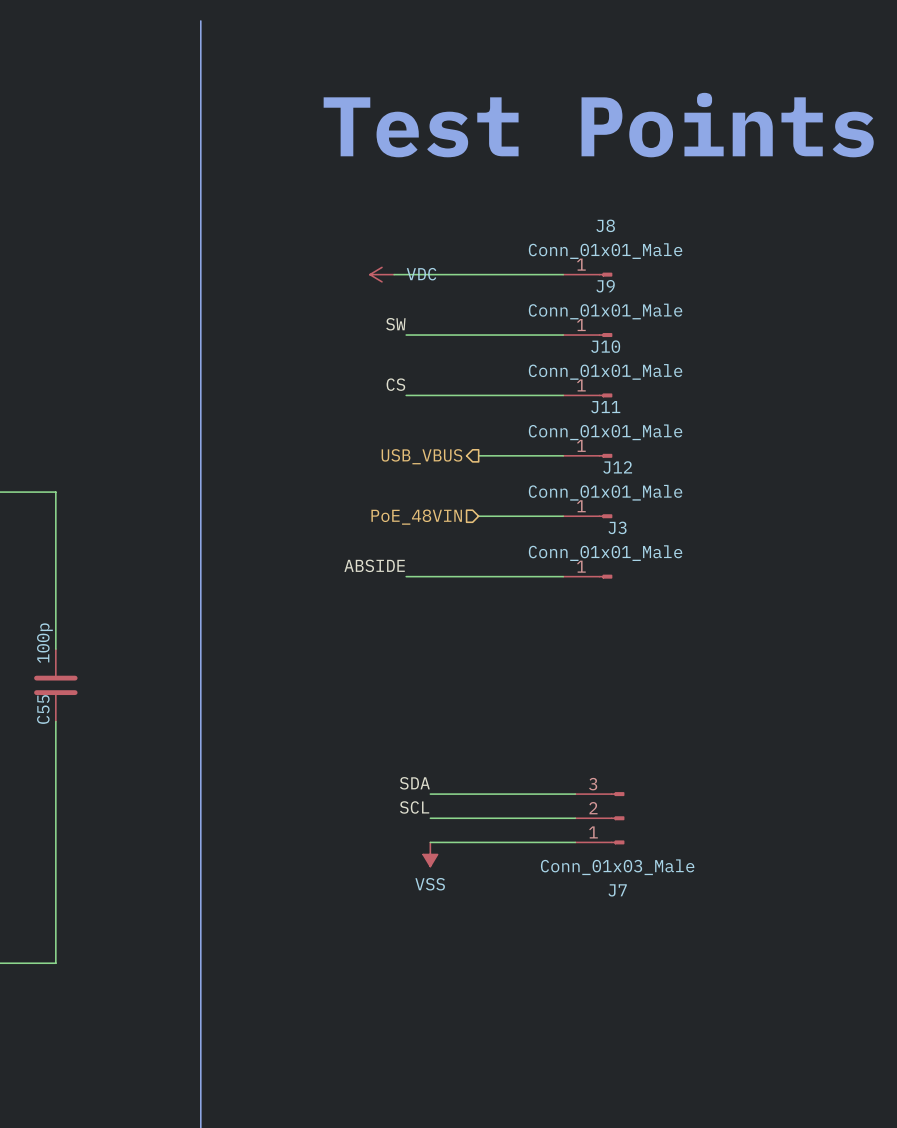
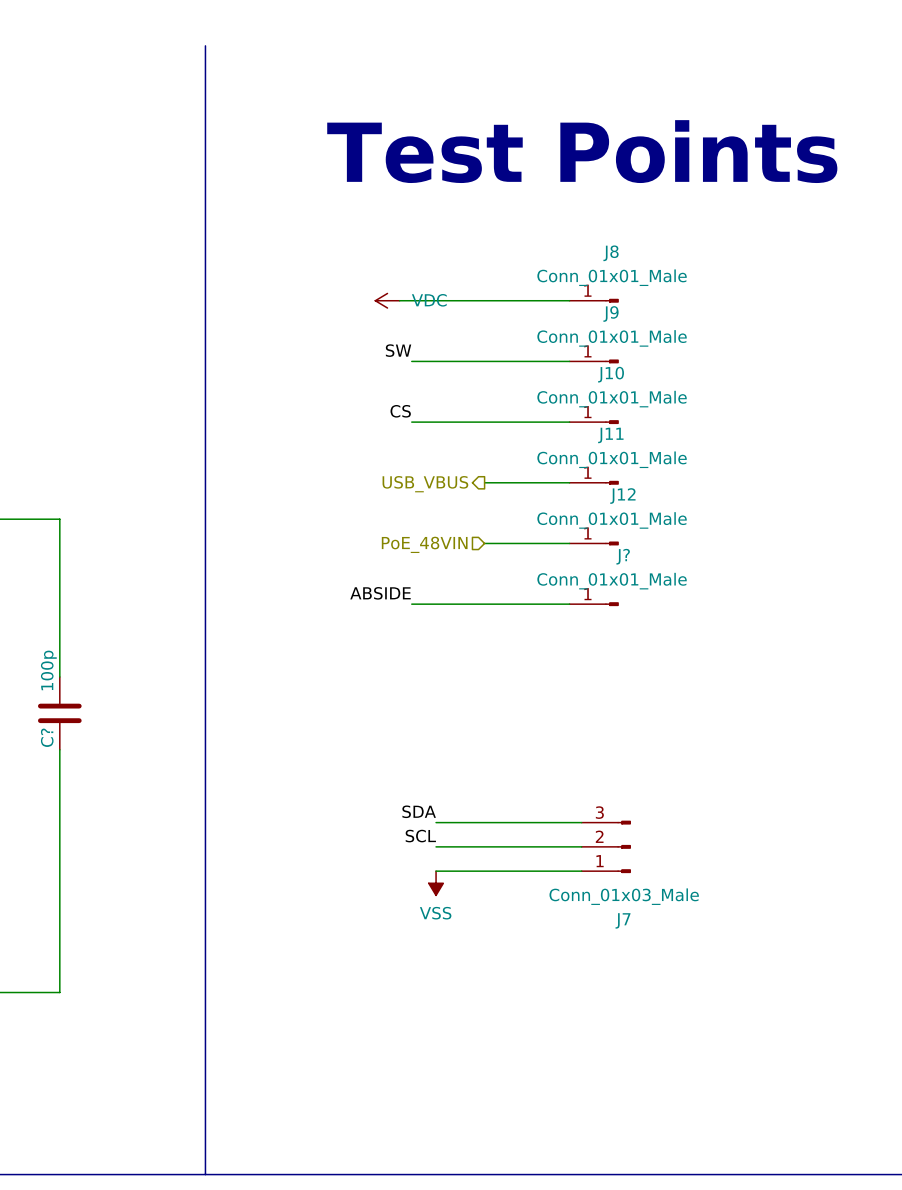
J3 name: J3 (617, 527) -> J? (623, 556)
C55 name: C55 (43, 709) -> C? (47, 737)

